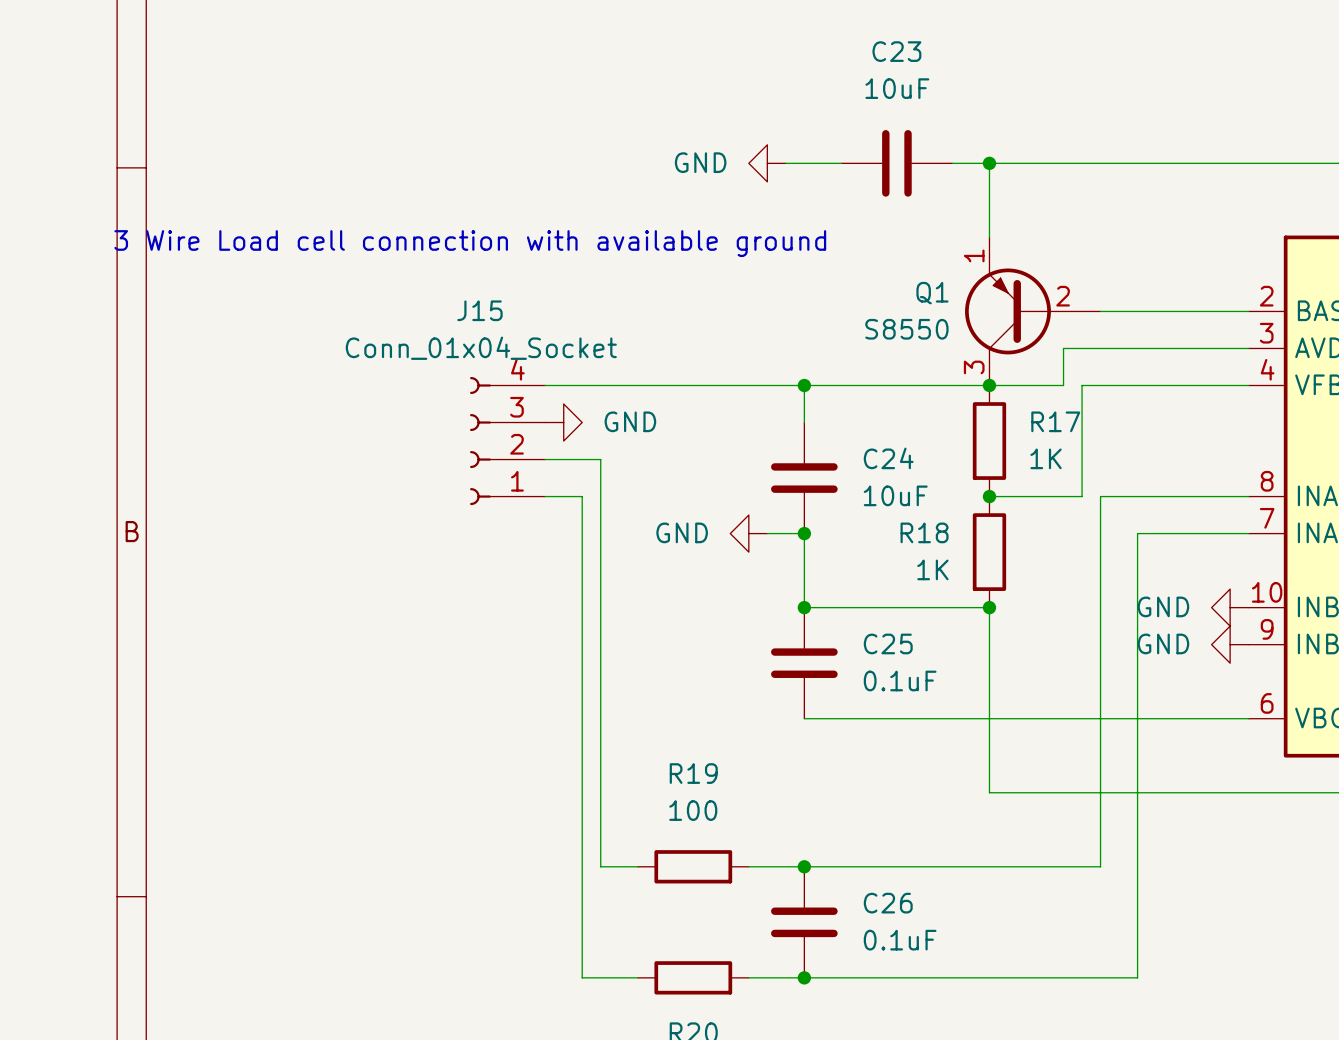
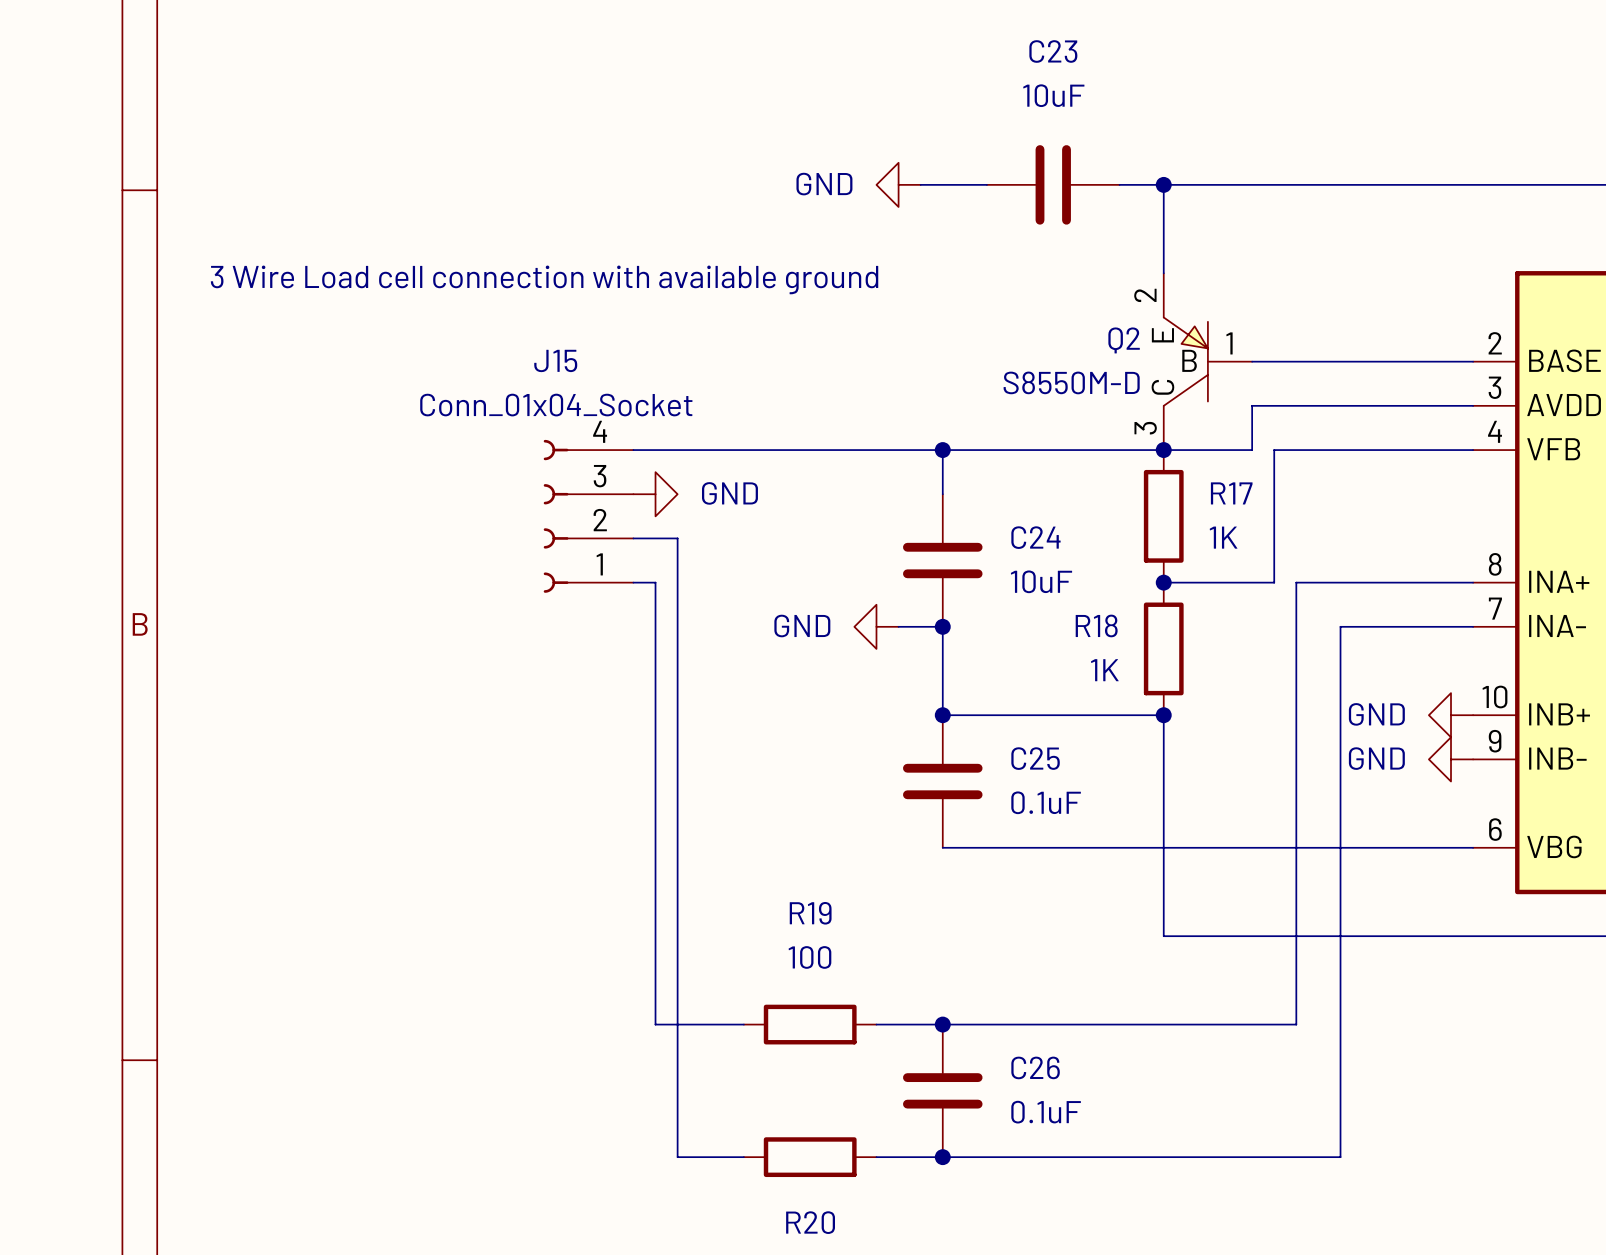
Q2: none -> S8550M-D (1207, 361)
Q1: S8550 (1032, 311) -> none
wire: (582, 459) (600, 459) (600, 866) -> (655, 582) (655, 1024) (699, 1024)
wire: (563, 496) (582, 496) -> (677, 538) (677, 582)

